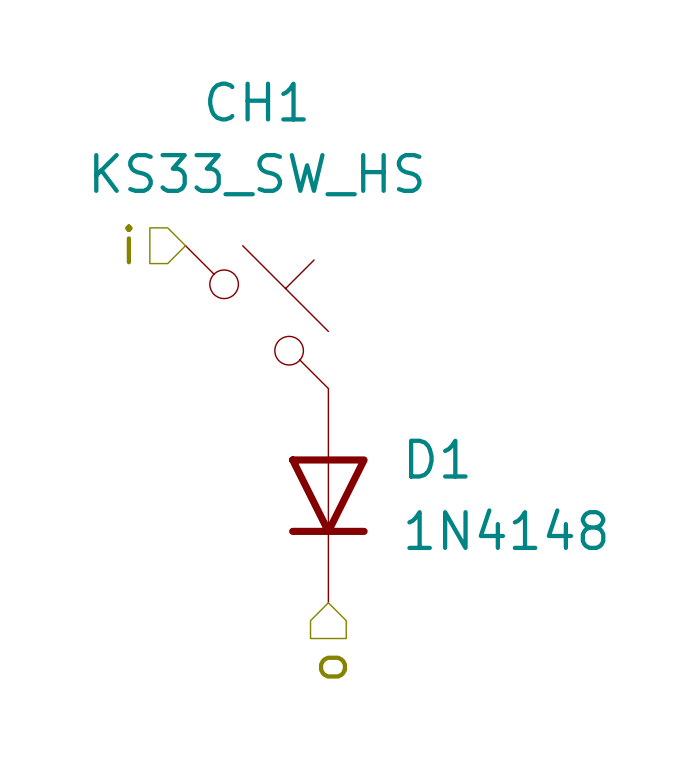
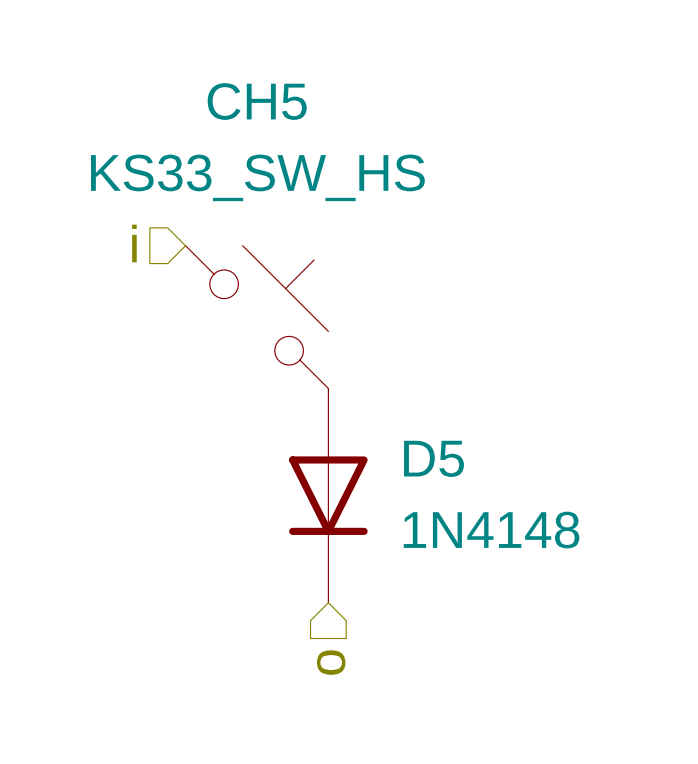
CH1 name: CH1 (256, 101) -> CH5 (257, 101)
D1 name: D1 (438, 458) -> D5 (434, 458)

